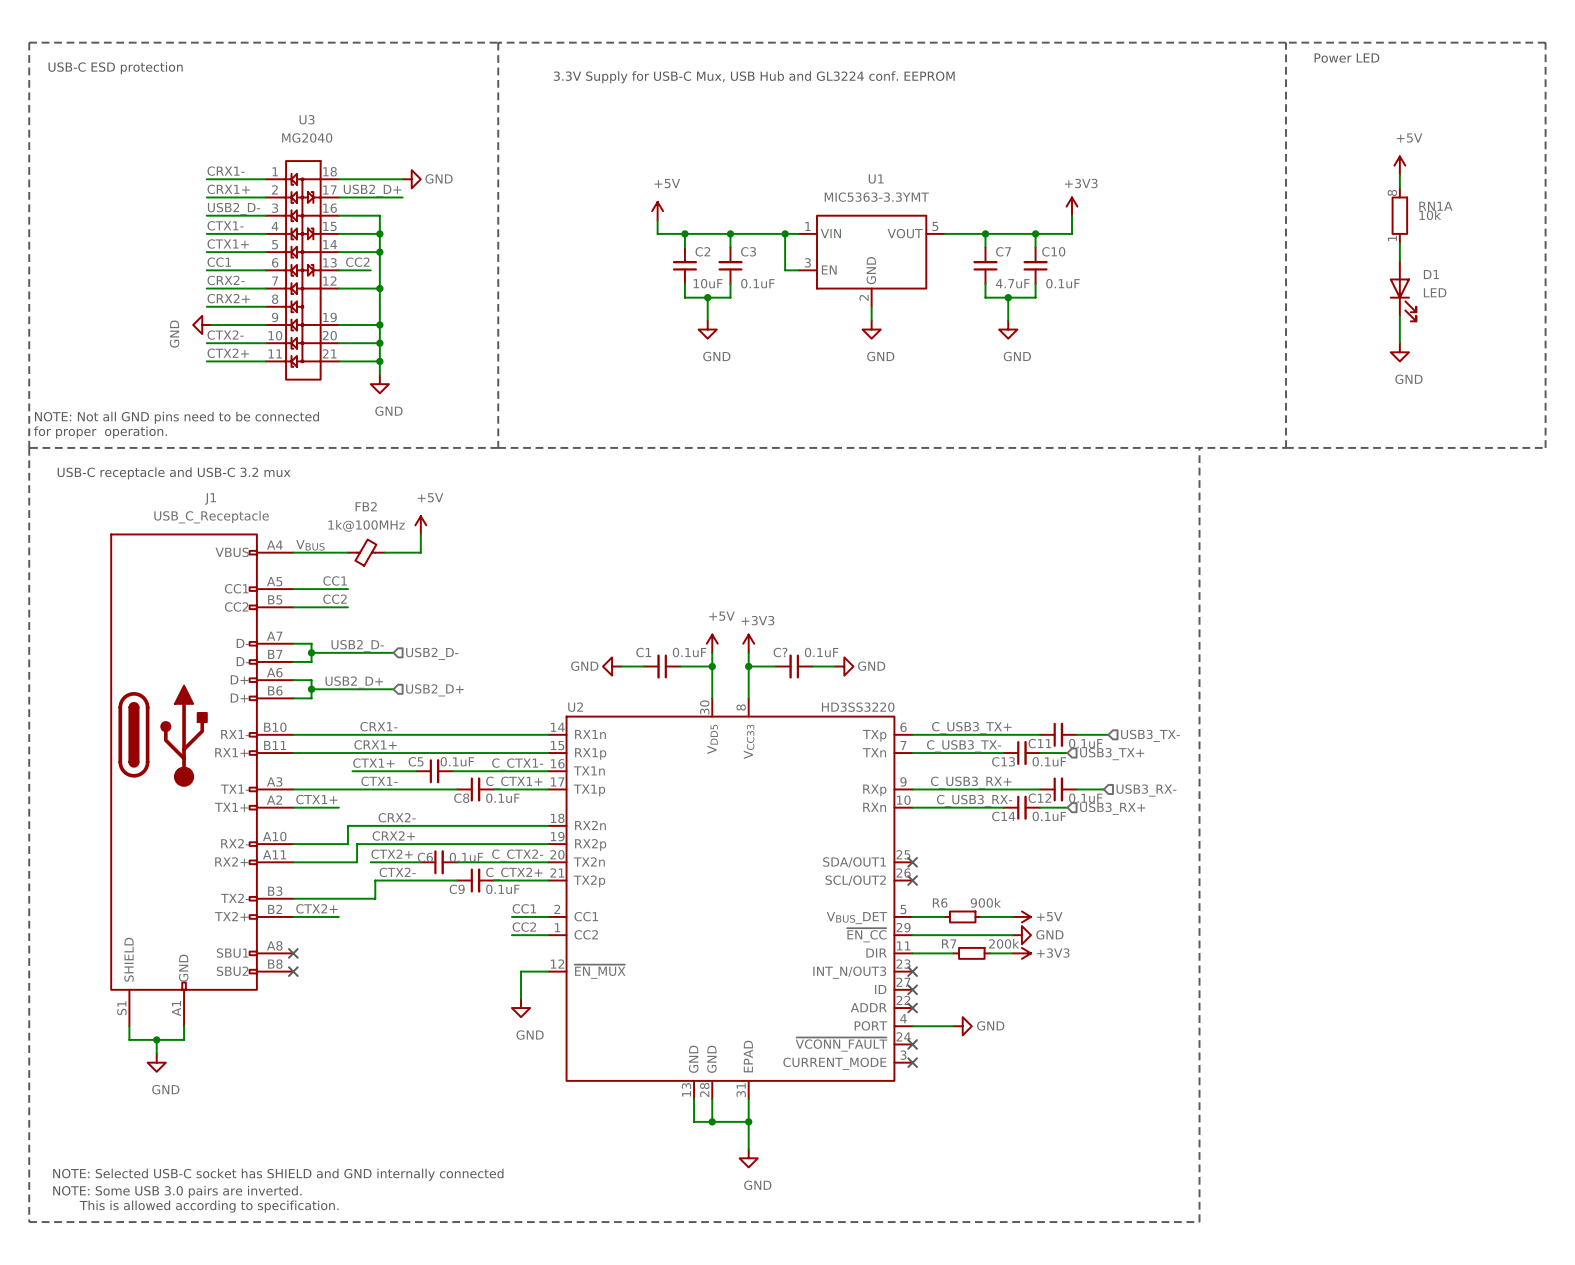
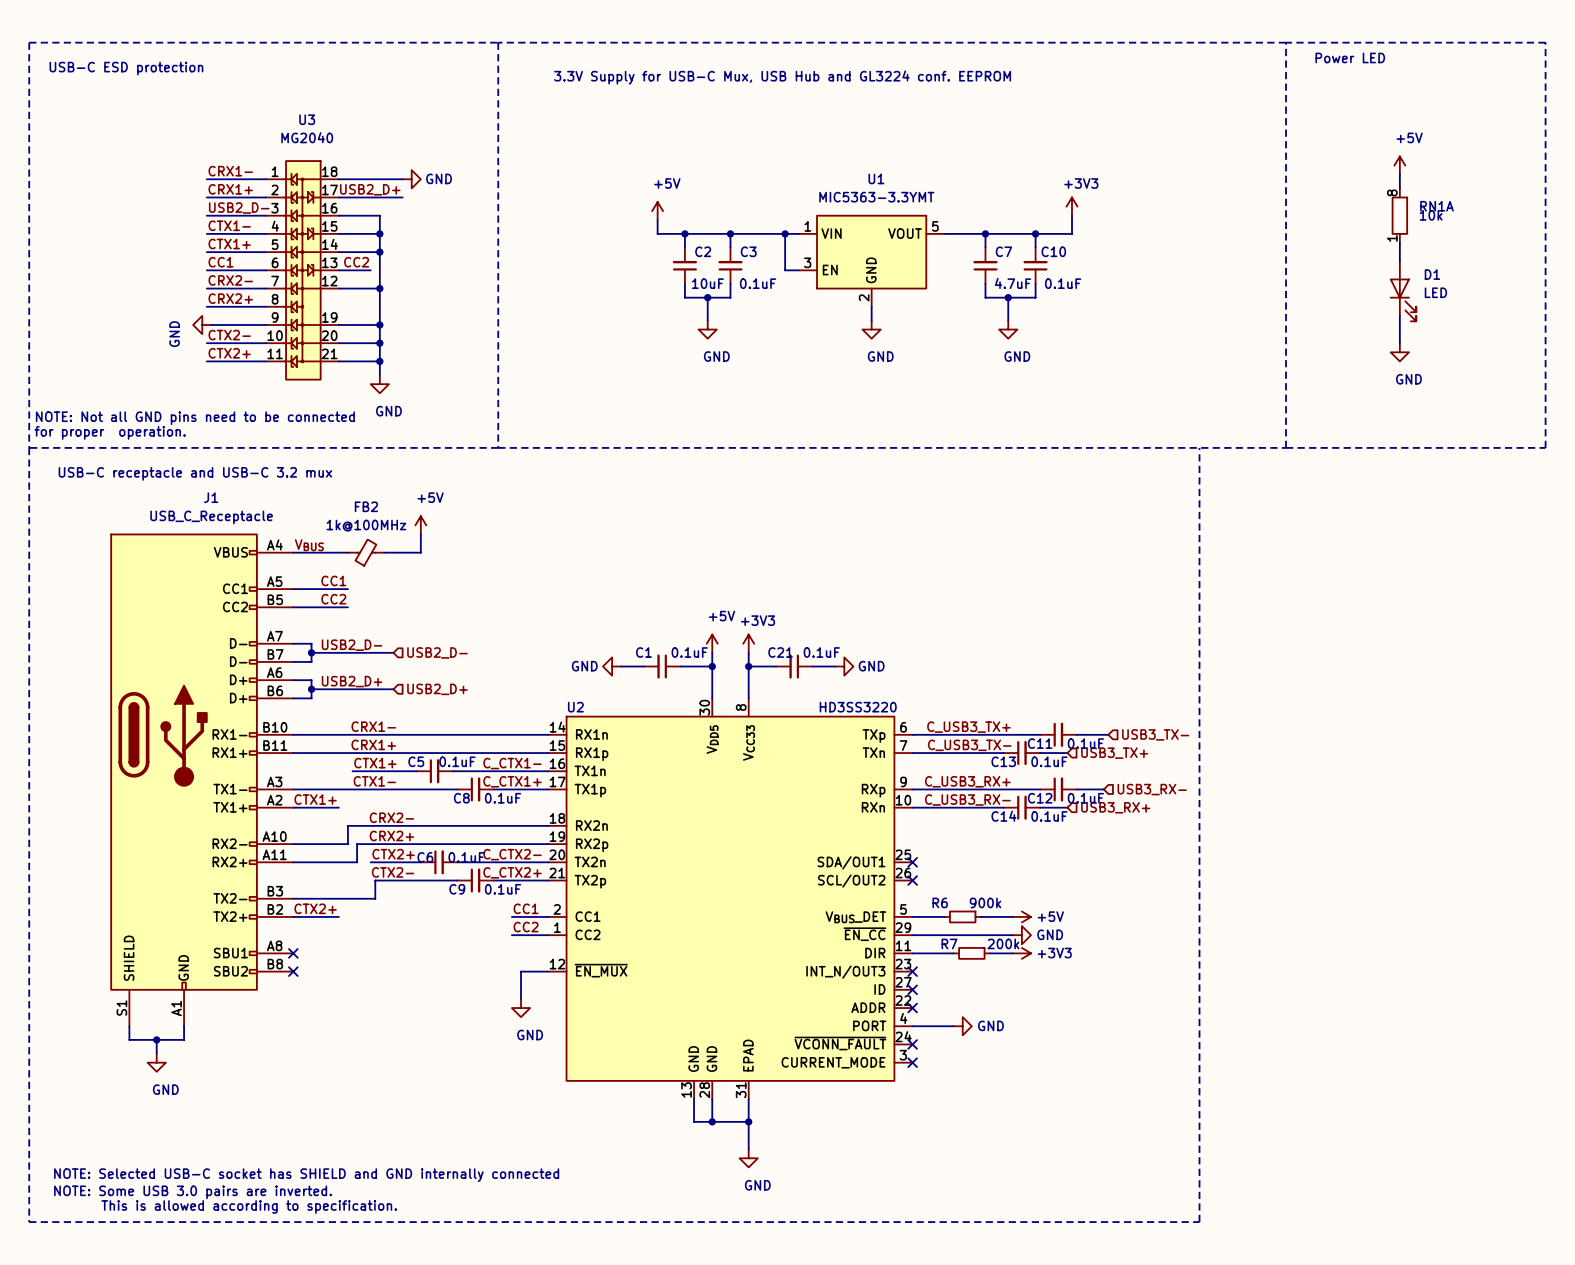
C? name: C? (780, 652) -> C21 (780, 652)

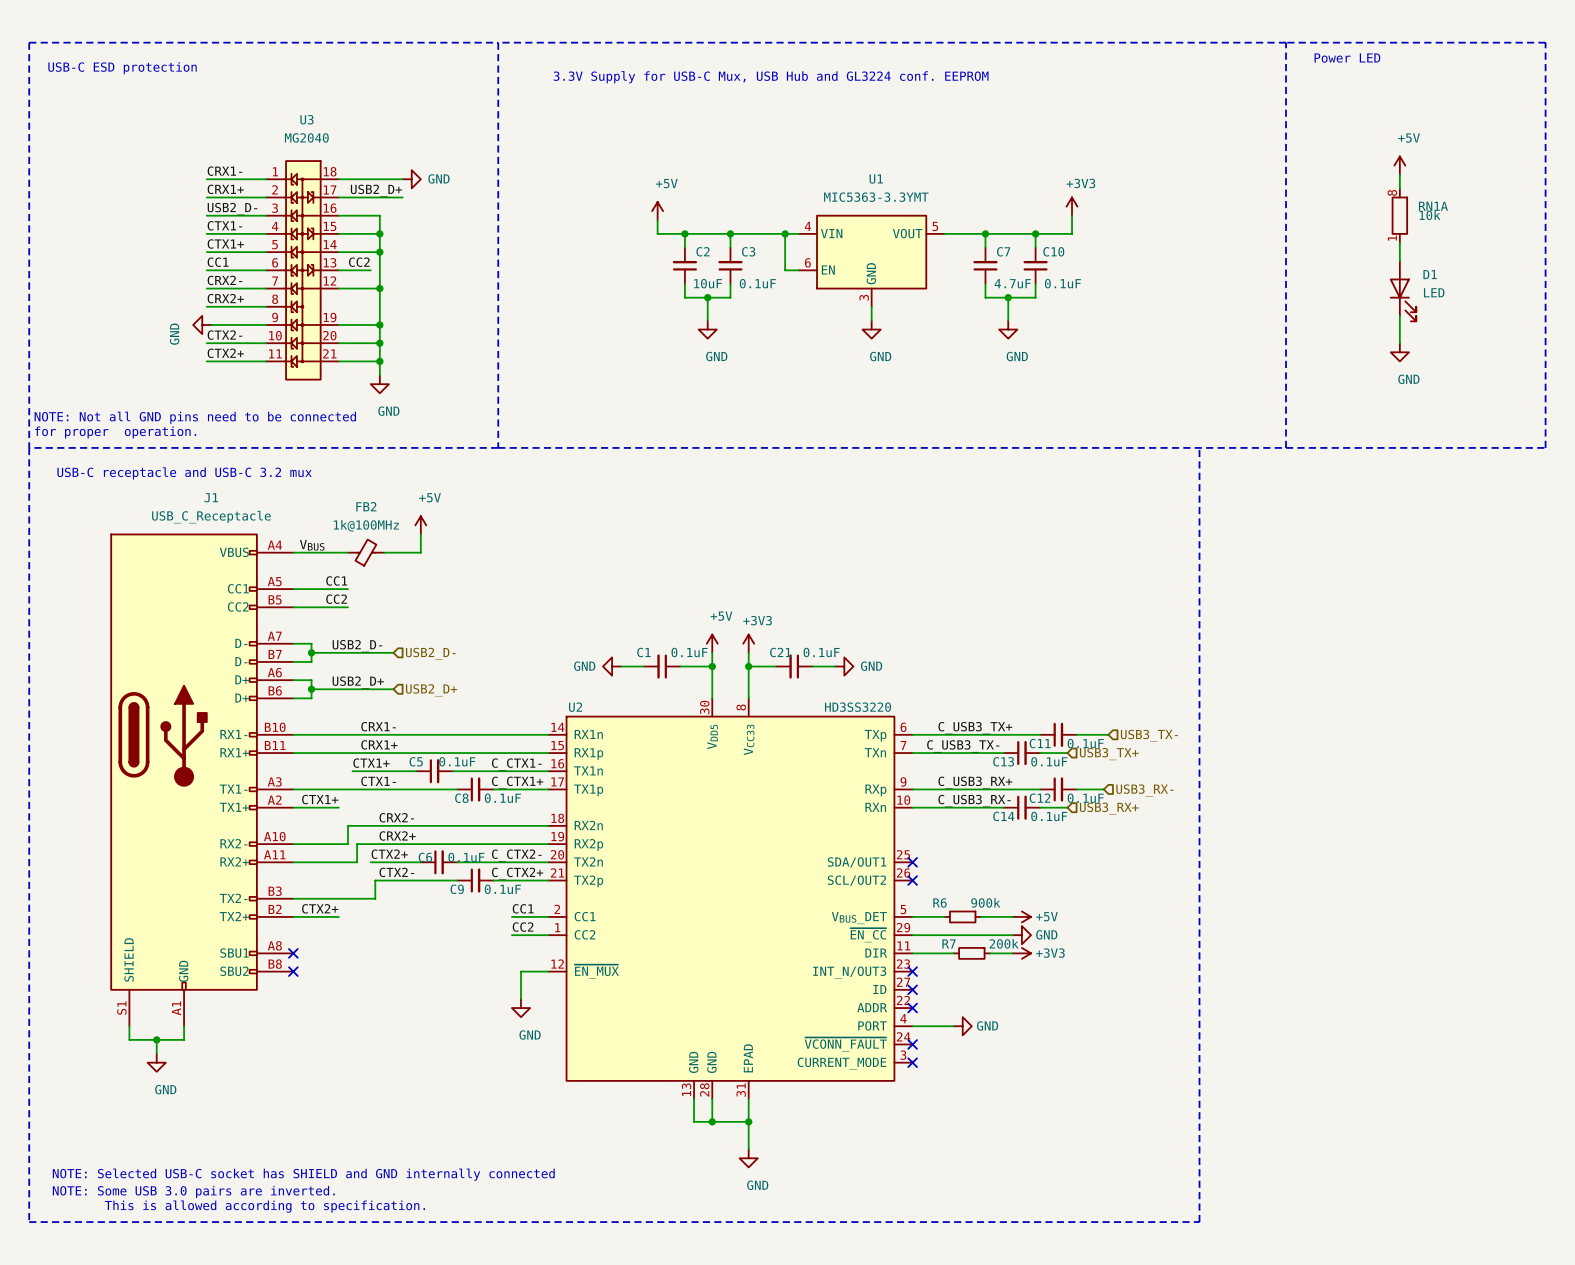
U1 pin number: 1 (807, 226) -> 4 (807, 226)
U1 pin number: 3 (807, 262) -> 6 (807, 262)
U1 pin number: 2 (864, 297) -> 3 (864, 297)

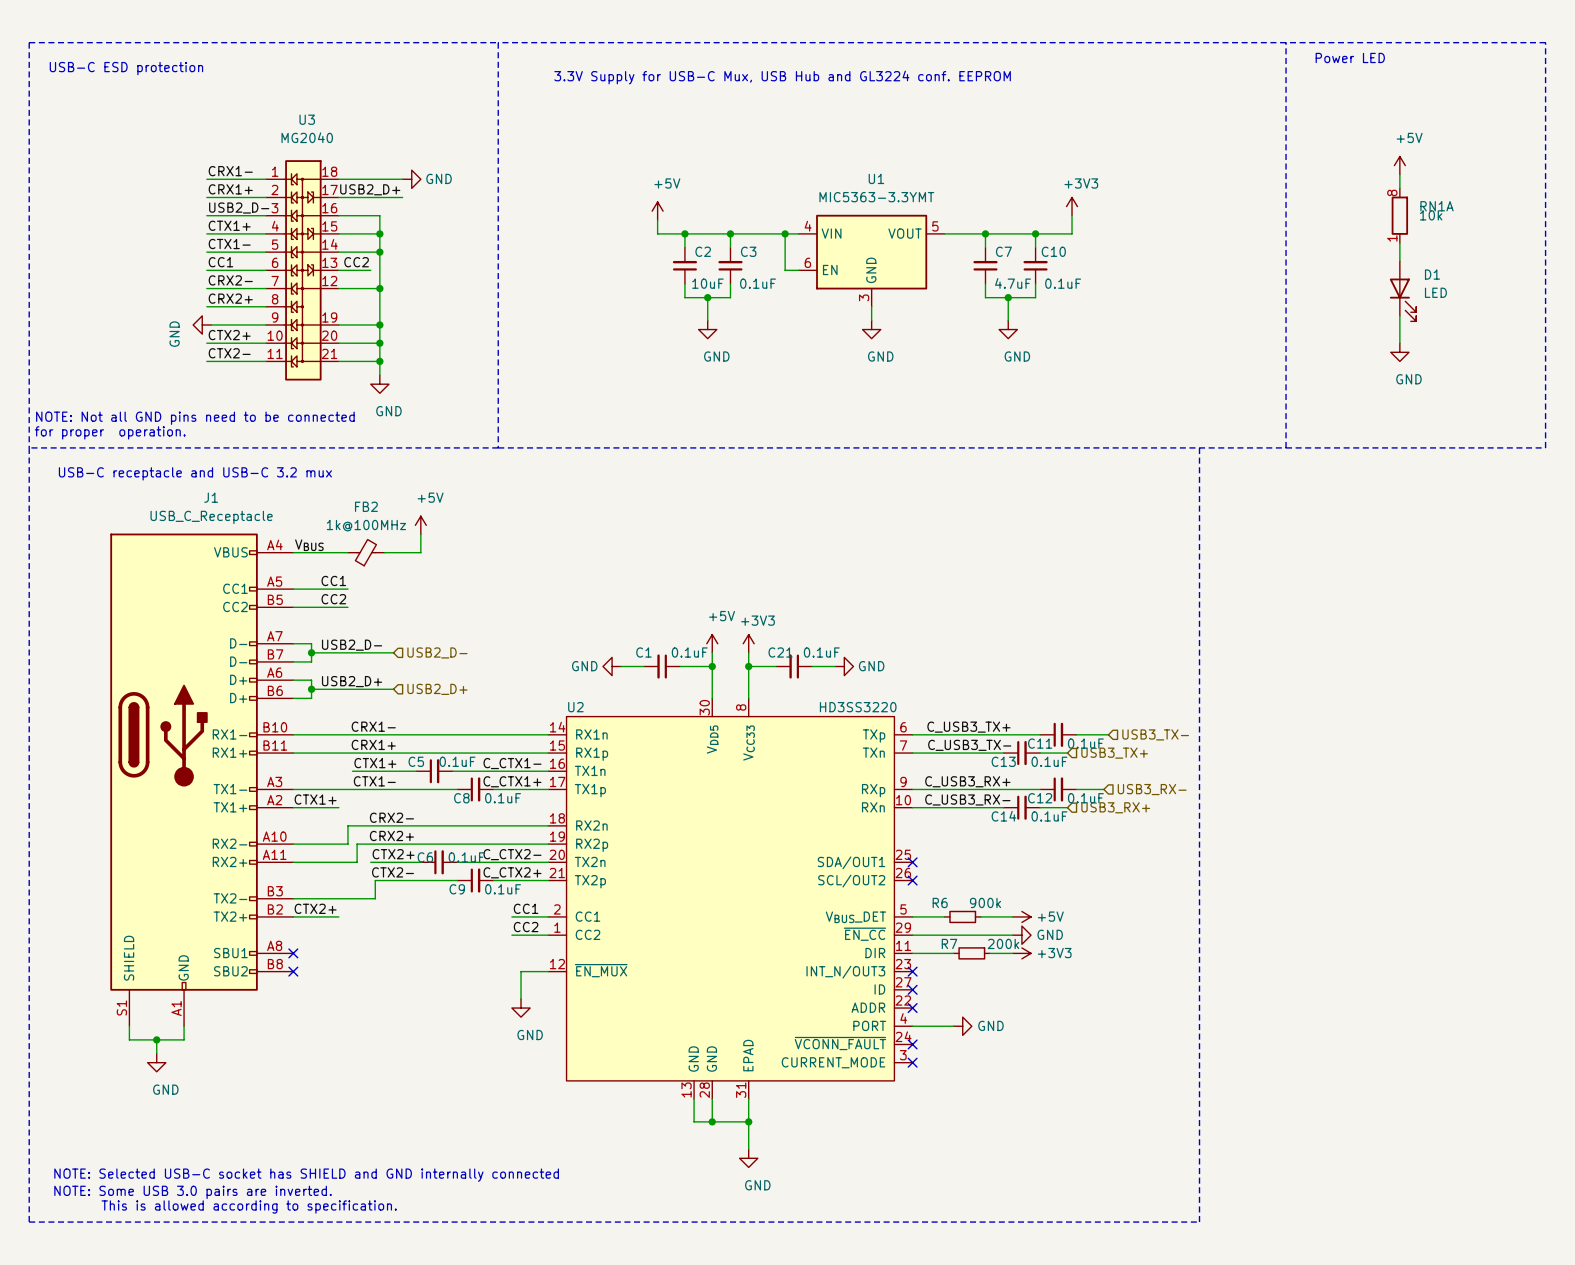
label: CTX1- (224, 225) -> CTX1+ (229, 225)
label: CTX1+ (225, 244) -> CTX1- (229, 244)
label: CTX2- (224, 335) -> CTX2+ (229, 335)
label: CTX2+ (225, 353) -> CTX2- (229, 353)

